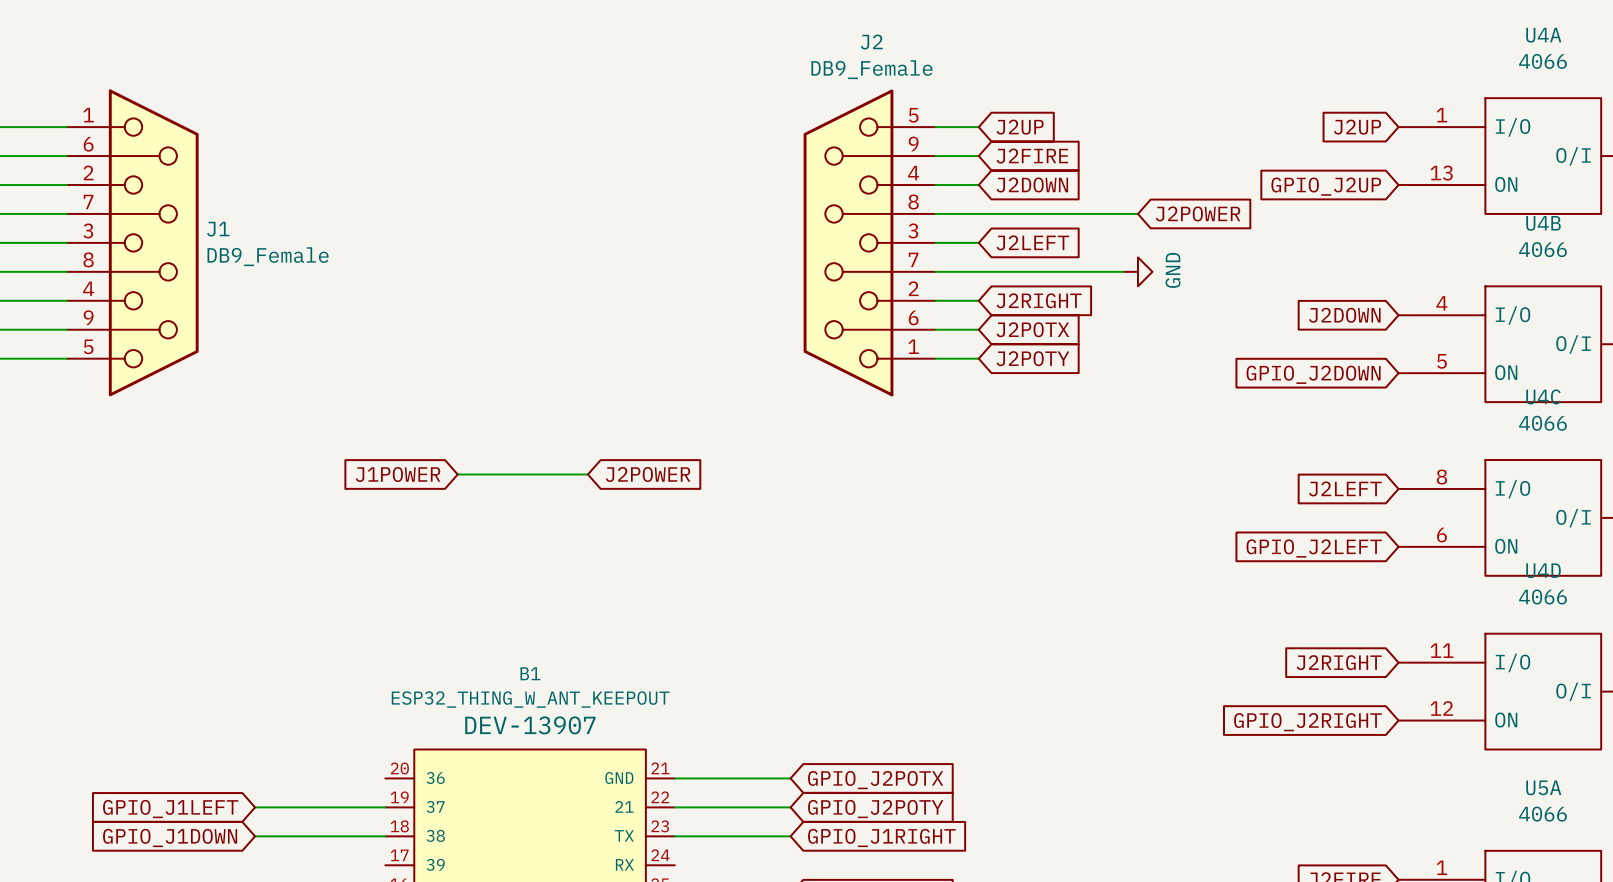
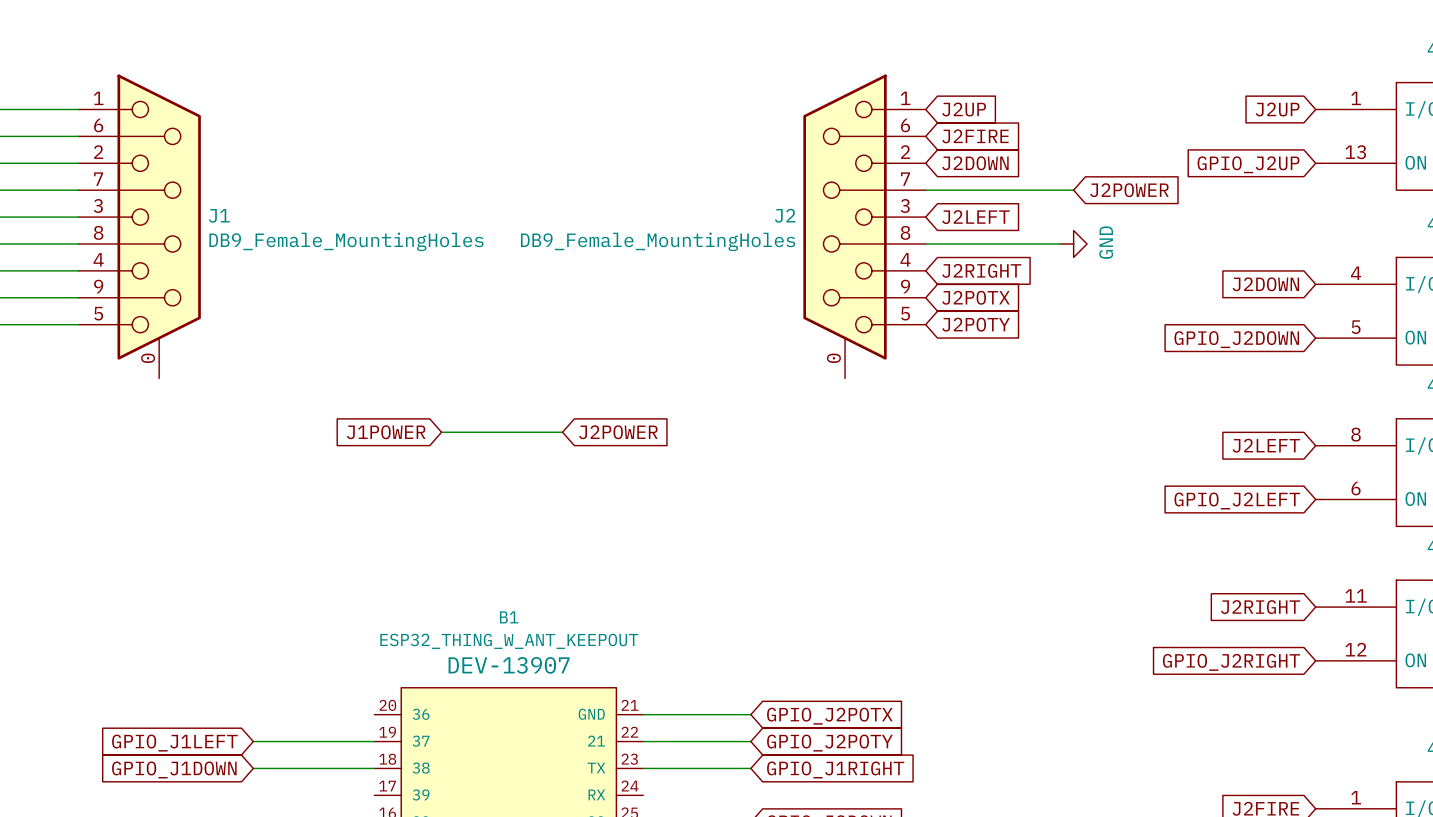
J2 name position: J2 (871, 42) -> J2 (785, 215)
J2 value: DB9_Female (871, 69) -> DB9_Female_MountingHoles (658, 241)
J1 symbol: [66, 89, 199, 397] -> [78, 74, 201, 379]
J2 symbol: [803, 89, 936, 397] -> [803, 74, 926, 379]
J1 value: DB9_Female (268, 256) -> DB9_Female_MountingHoles (346, 241)

